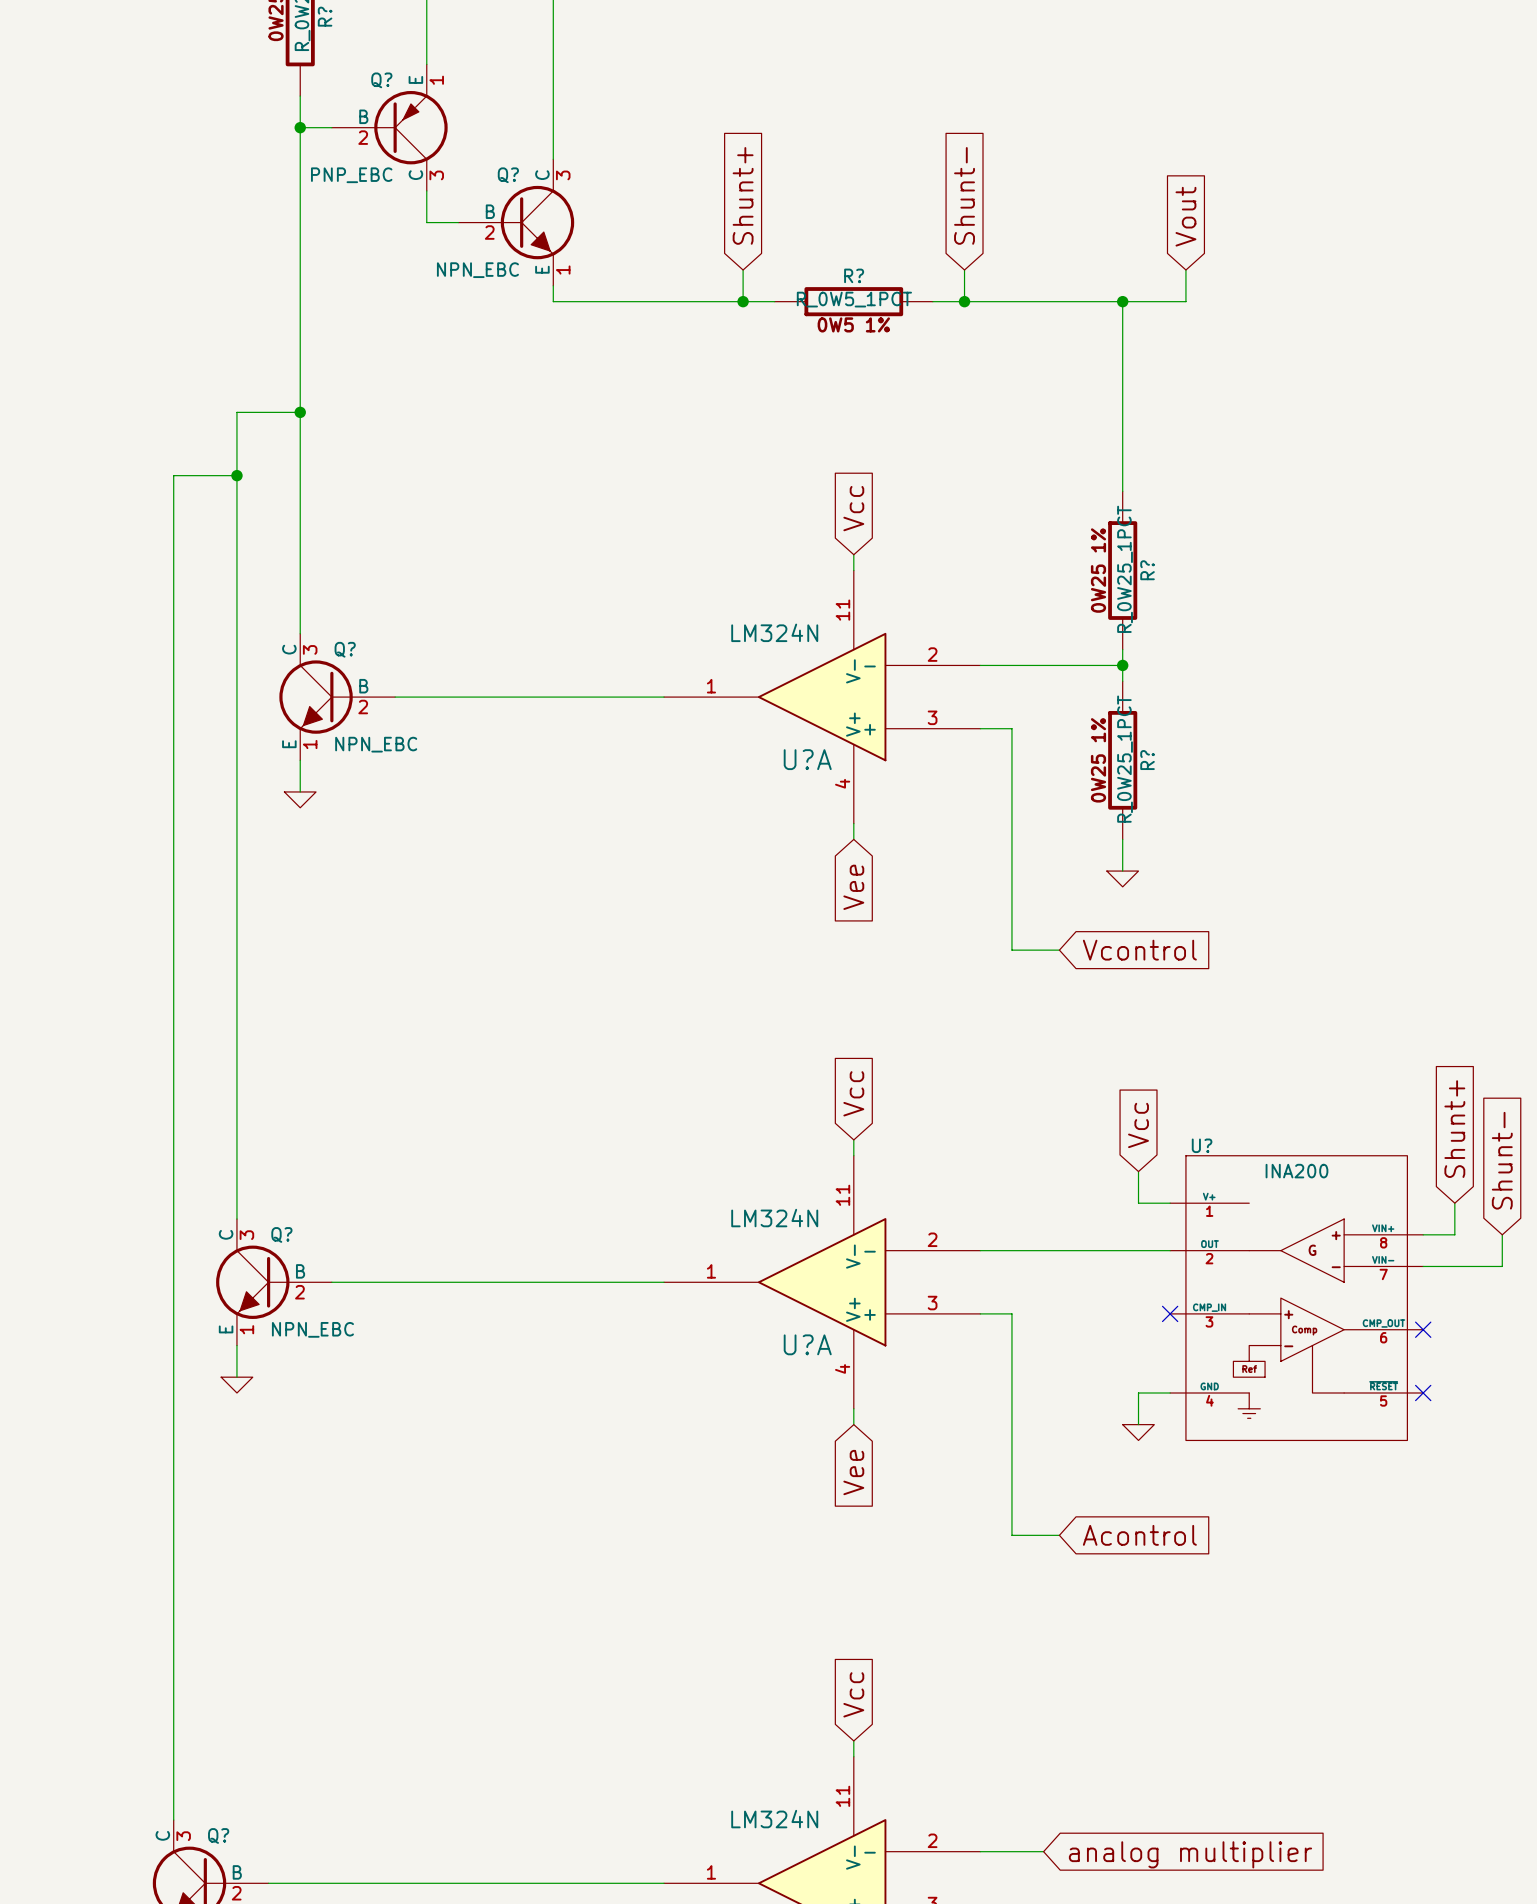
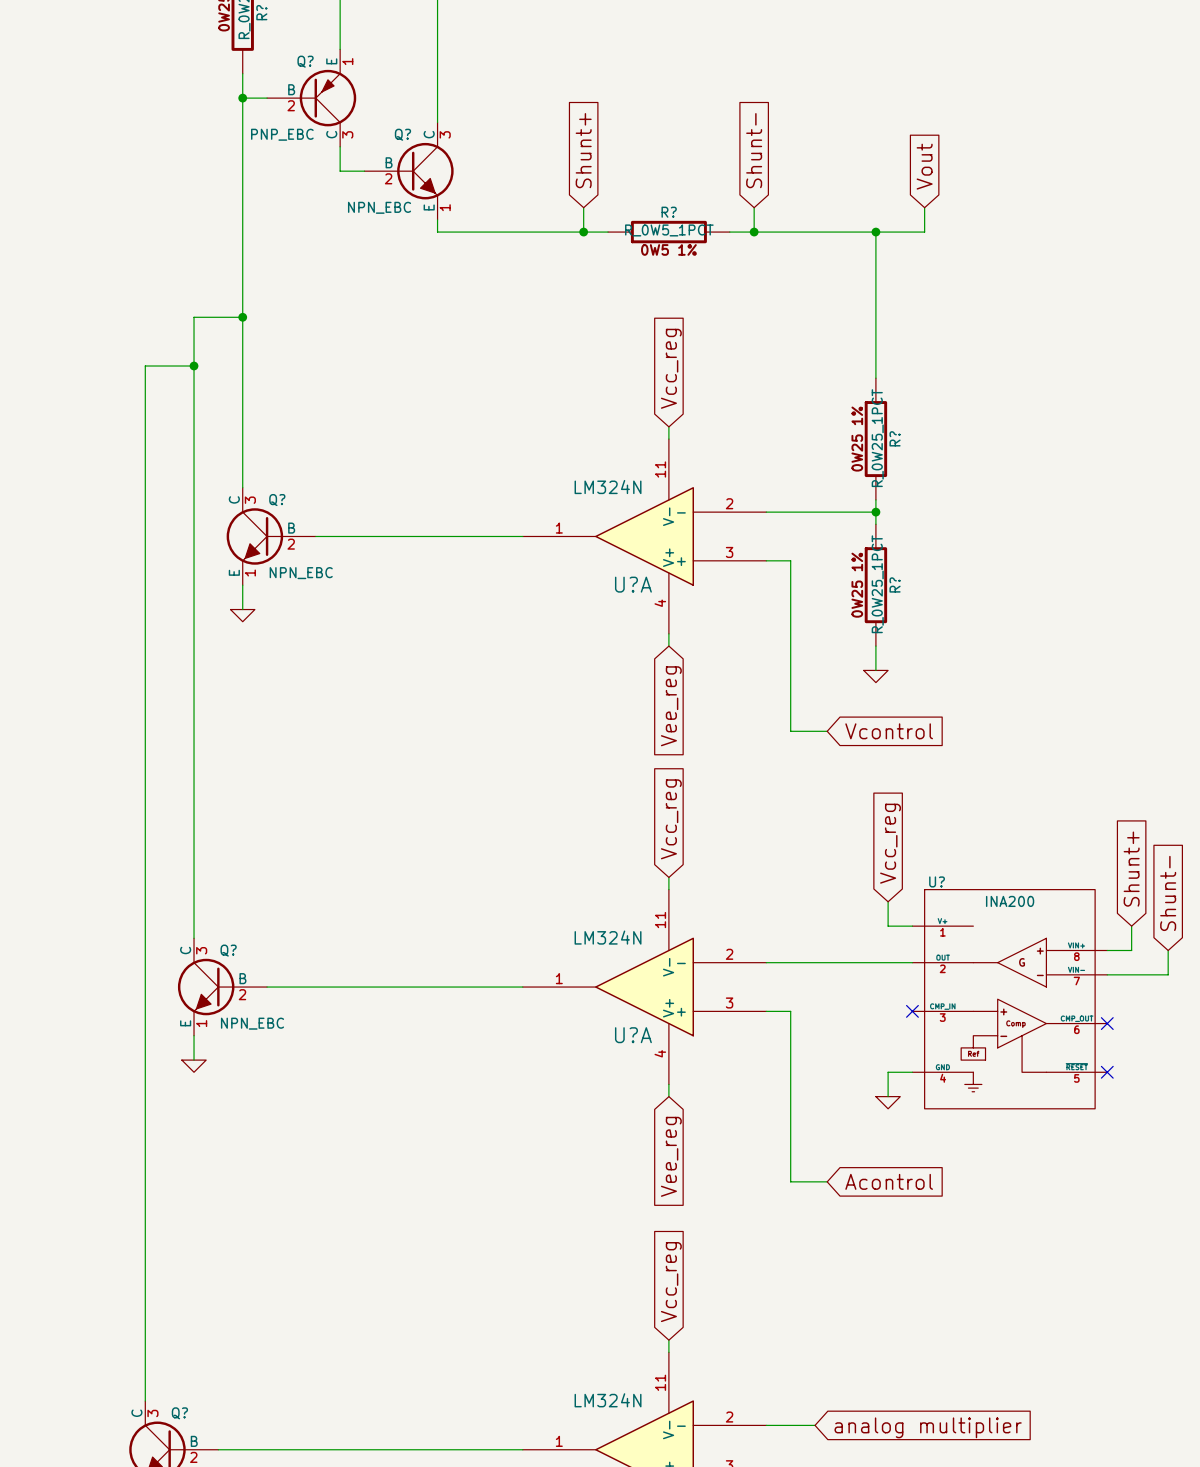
global label: Vcc (853, 508) -> Vcc_reg (671, 368)
global label: Vee (853, 887) -> Vee_reg (671, 706)
global label: Vcc (853, 1093) -> Vcc_reg (671, 819)
global label: Vcc (1138, 1125) -> Vcc_reg (890, 843)
global label: Vee (853, 1472) -> Vee_reg (671, 1156)
global label: Vcc (853, 1694) -> Vcc_reg (671, 1282)

